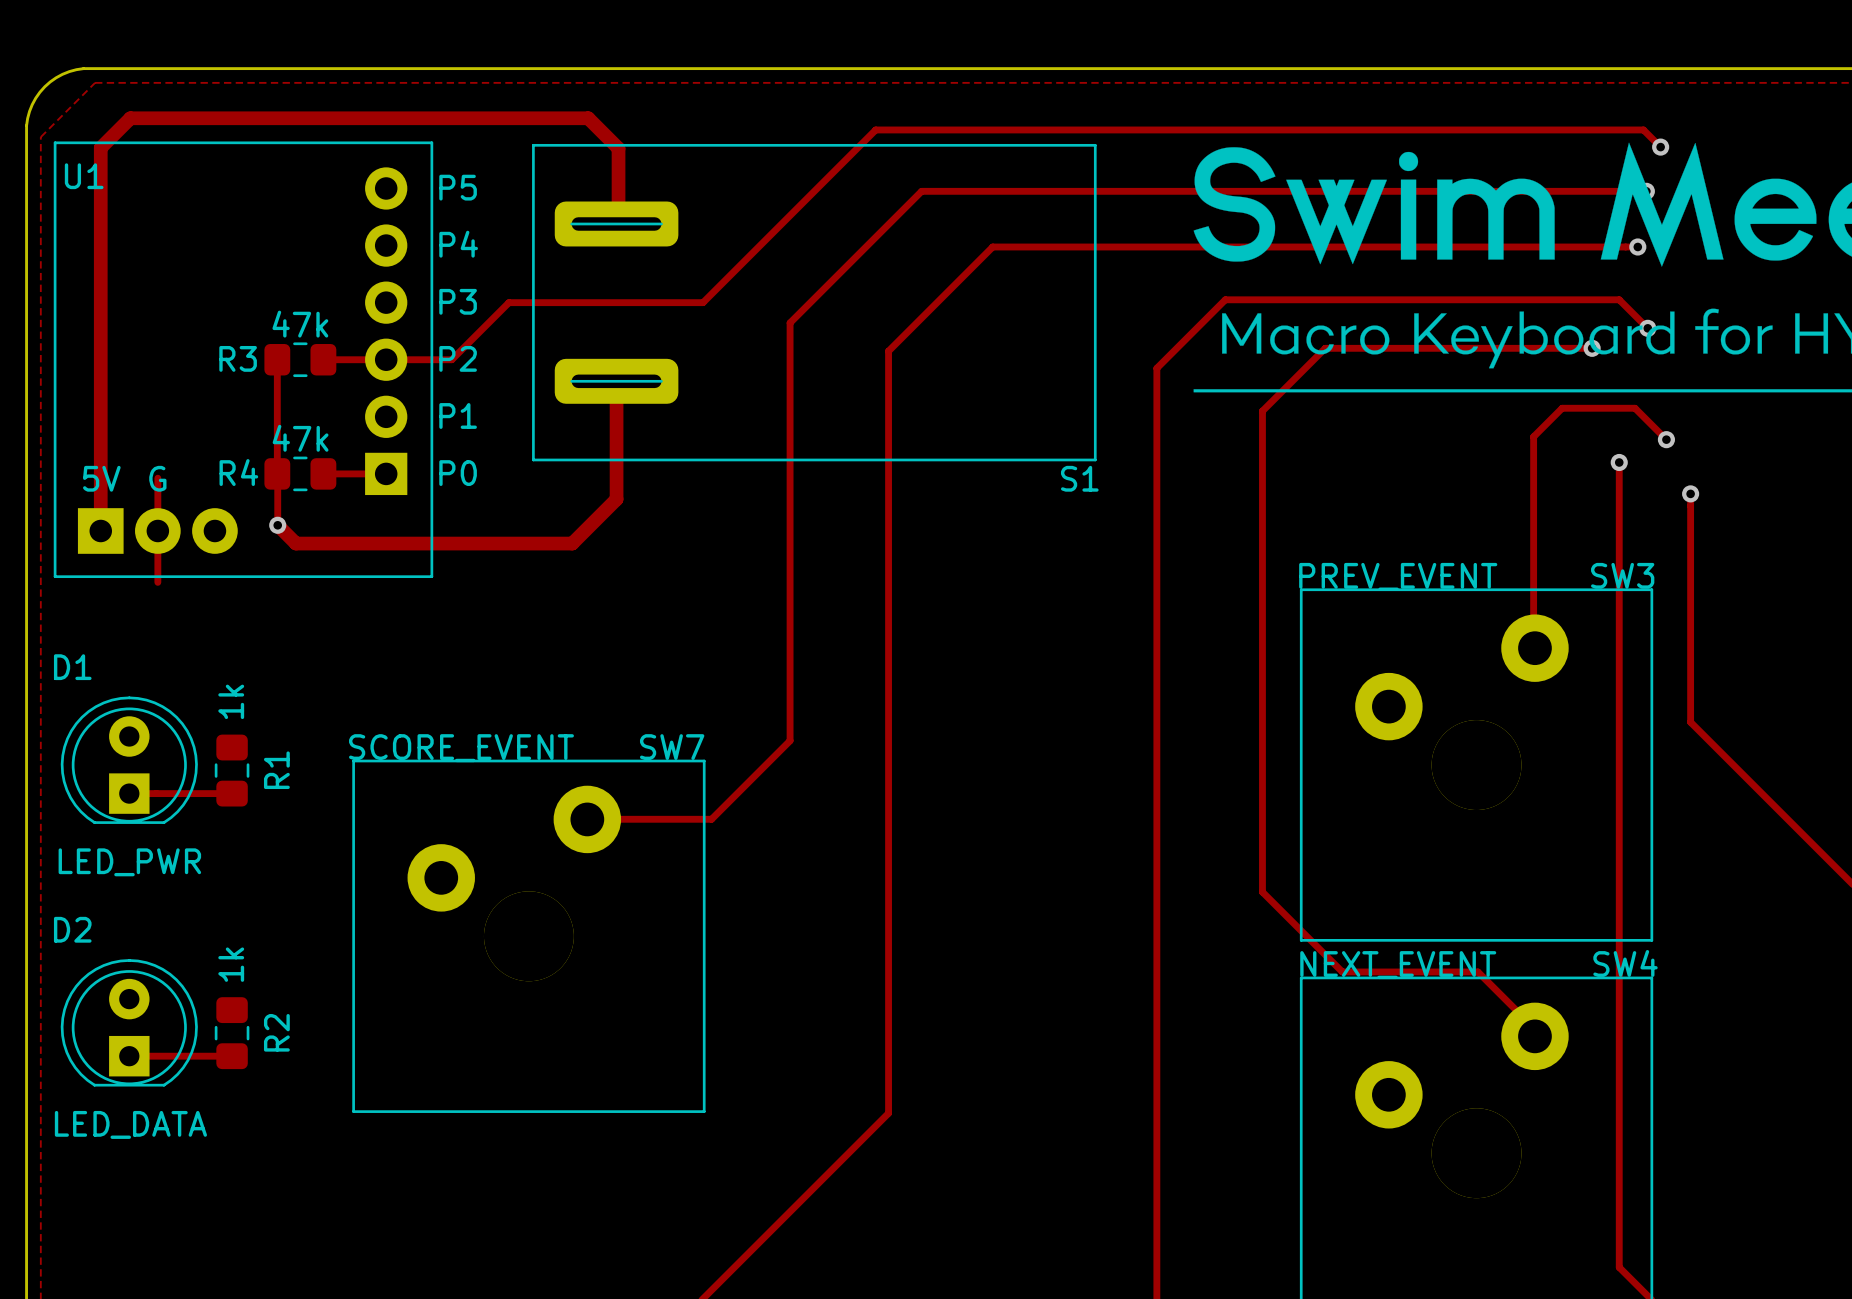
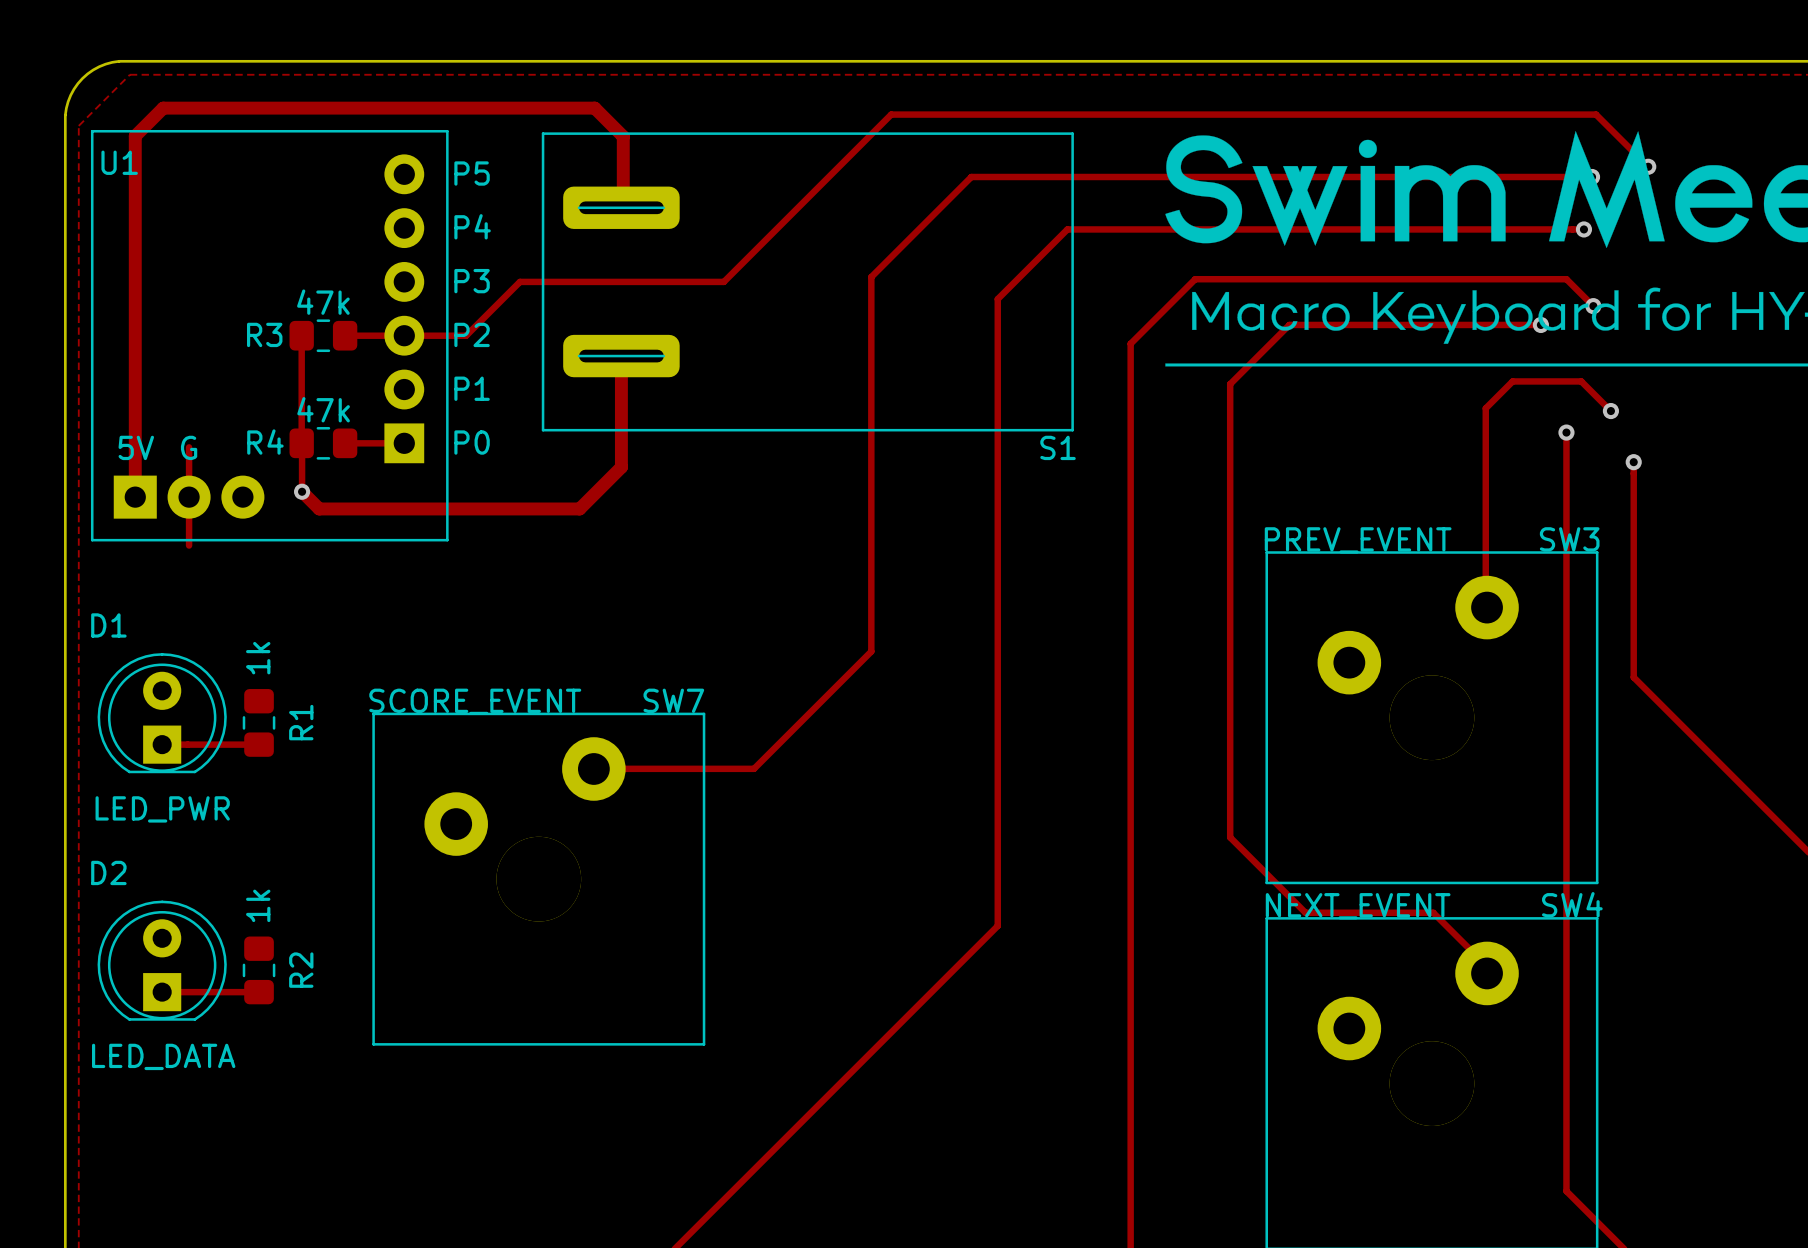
track: (1660, 147) (1643, 129) (875, 129) (703, 302) -> (1648, 166) (1596, 114) (891, 114) (723, 281) (702, 281)
via position: (1660, 147) -> (1648, 166)
track: (987, 191) (921, 191) (790, 322) (790, 740) (711, 819) -> (971, 176) (871, 277) (871, 651) (754, 768) (710, 768)
track: (1089, 246) (992, 246) (888, 351) (888, 1113) -> (1067, 229) (997, 299) (997, 925) (877, 1045)

